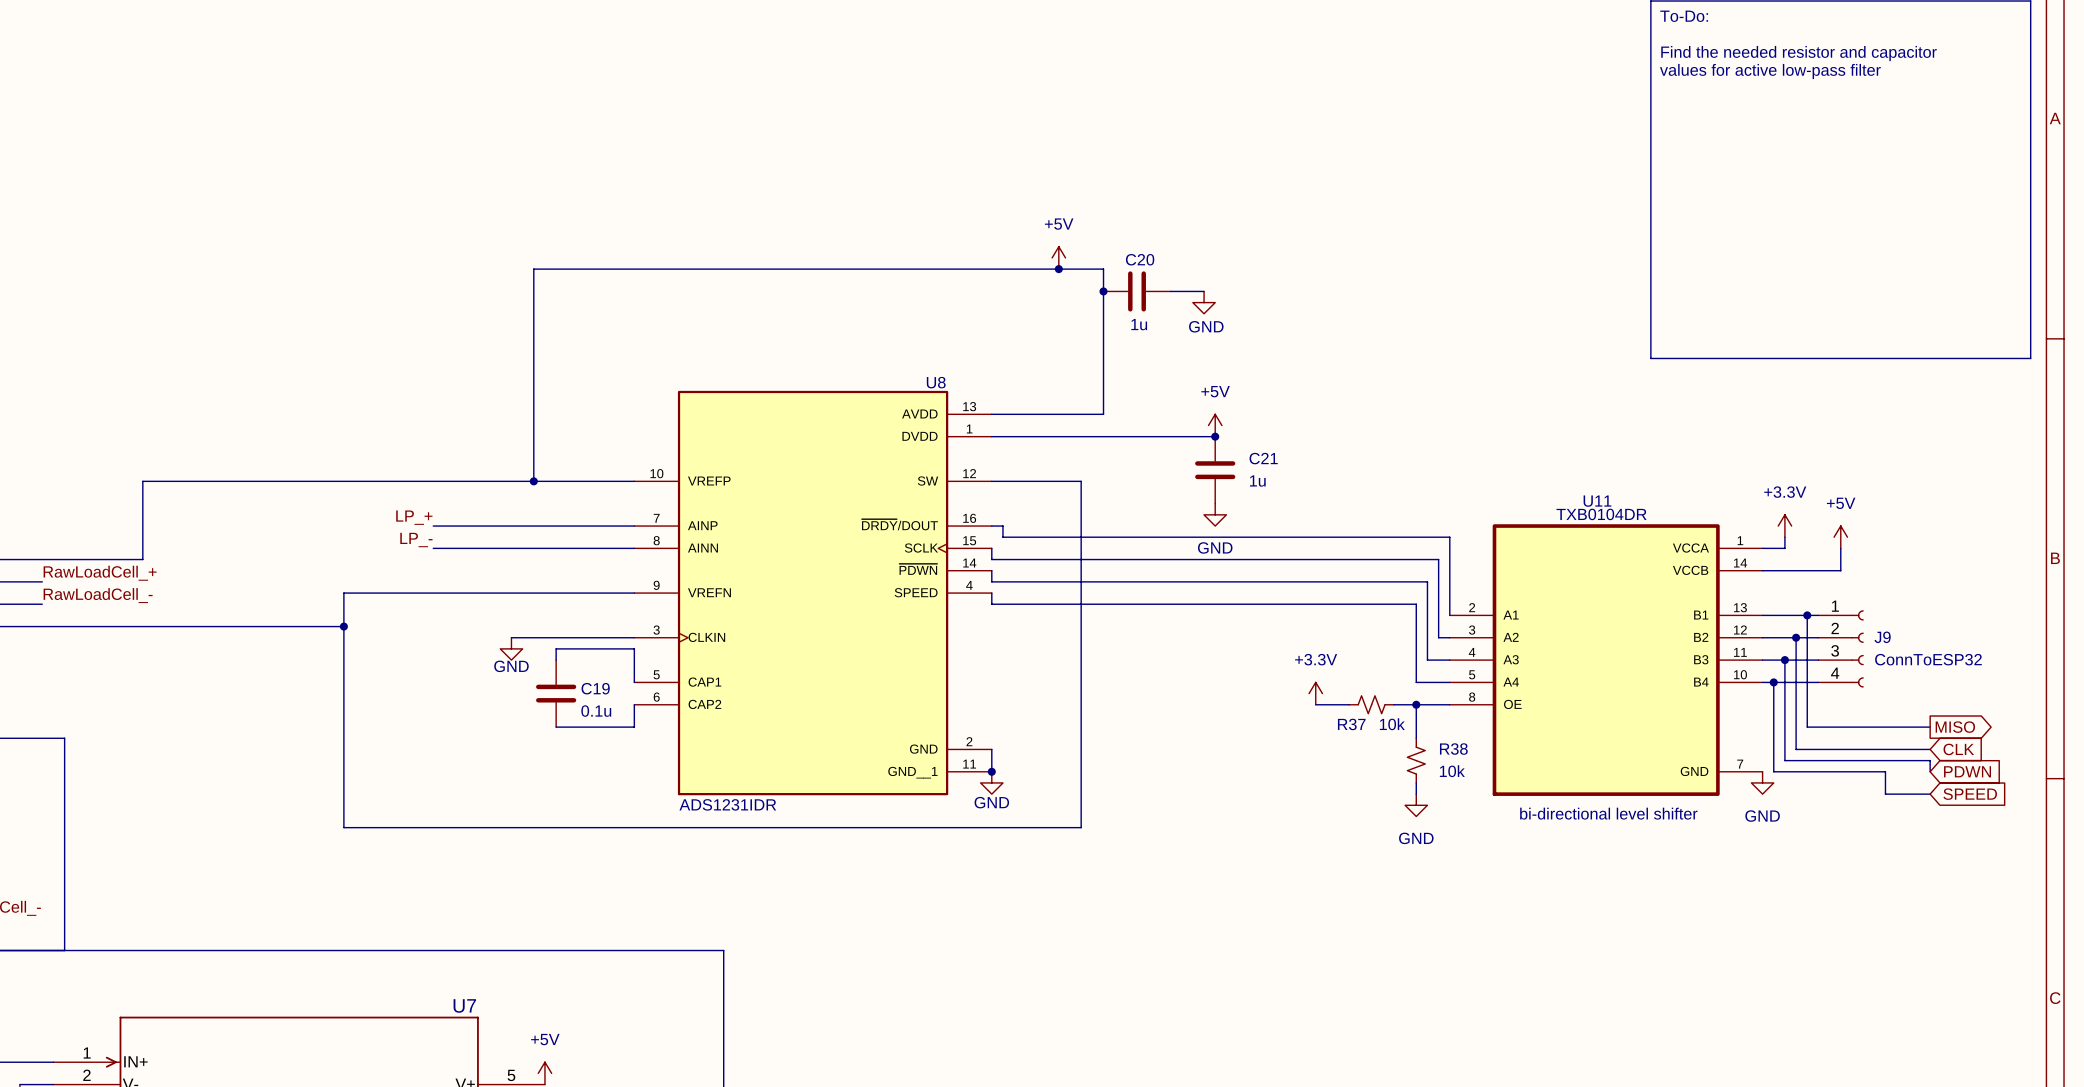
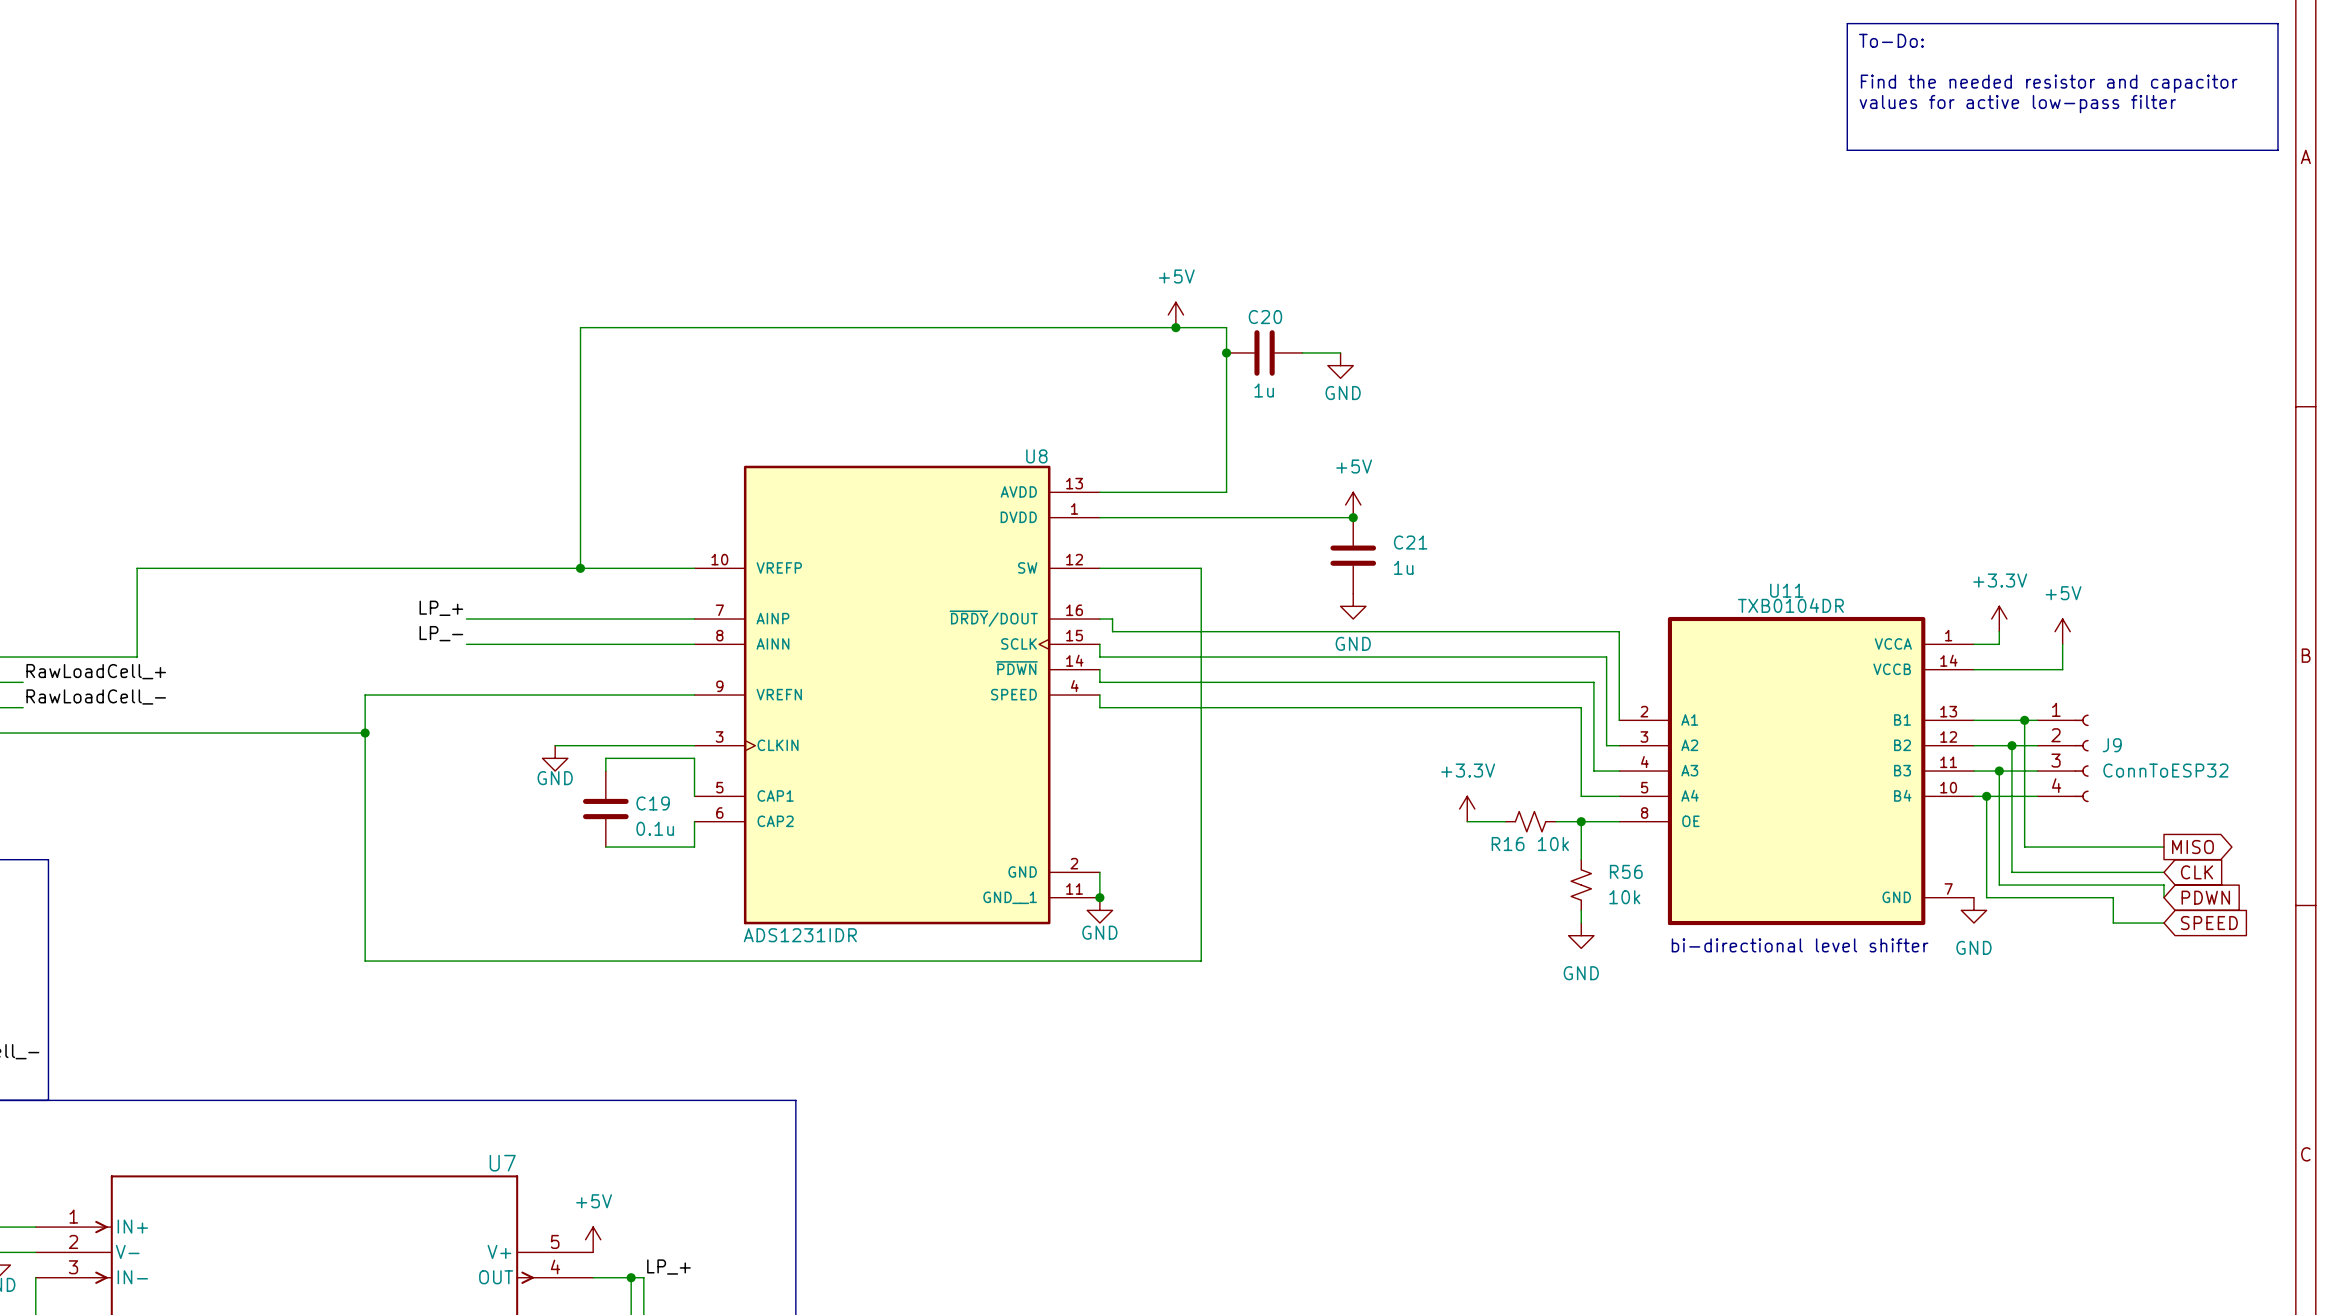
line: (1650, 112) (1650, 358) (2030, 358) (2030, 112) -> (1847, 150) (2278, 150)
R37 name: R37 (1351, 724) -> R16 (1508, 844)
R38 name: R38 (1453, 749) -> R56 (1626, 871)

